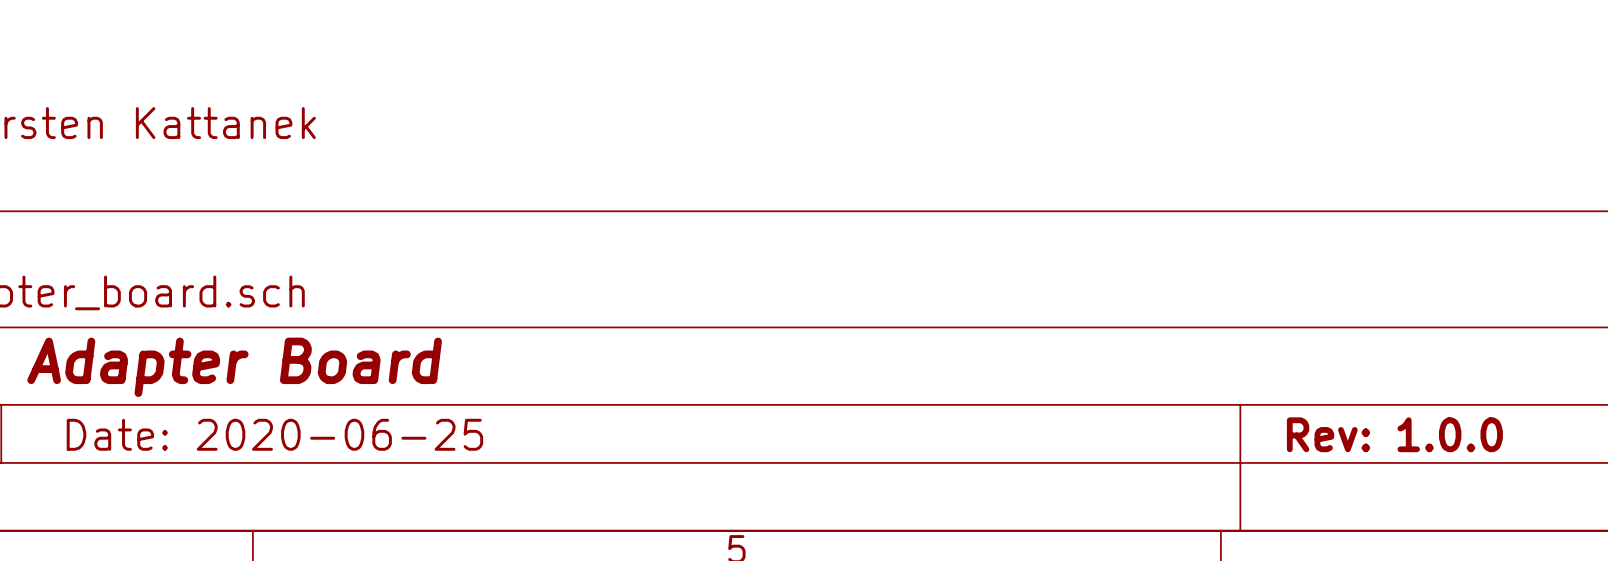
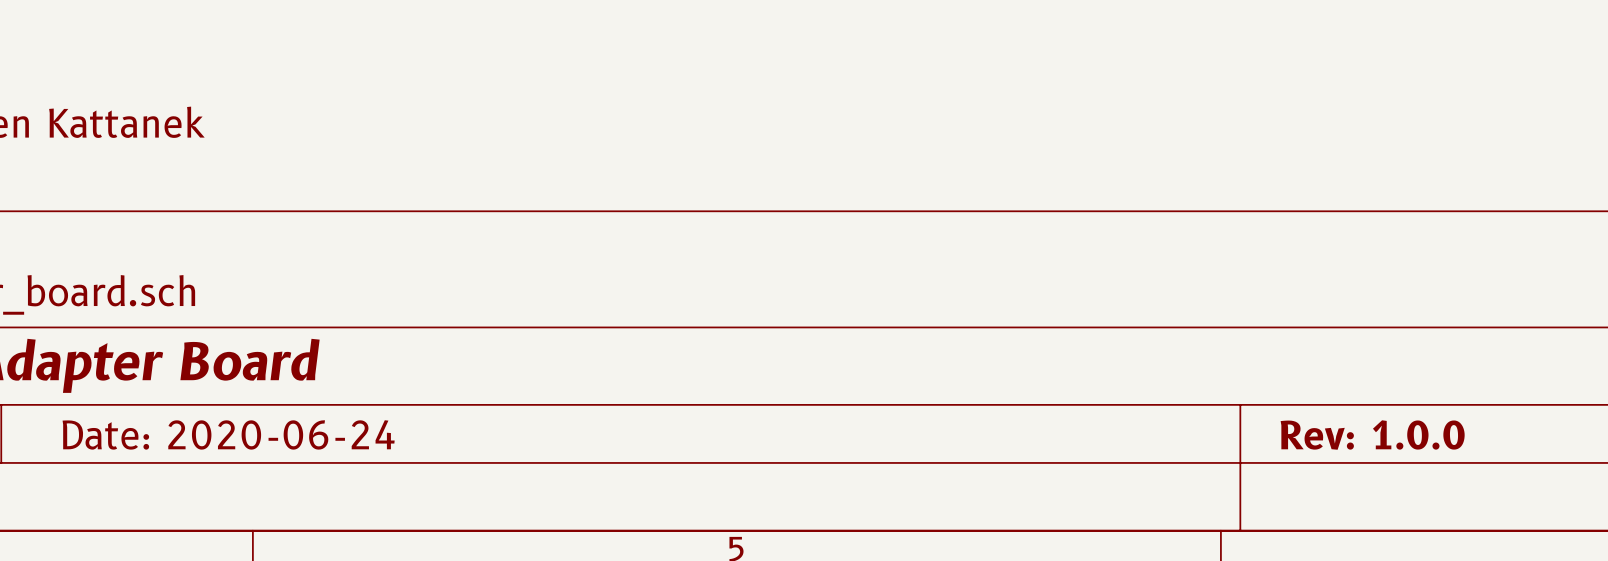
title block: Date: 2020-06-25 (274, 434) -> Date: 2020-06-24 (228, 434)

